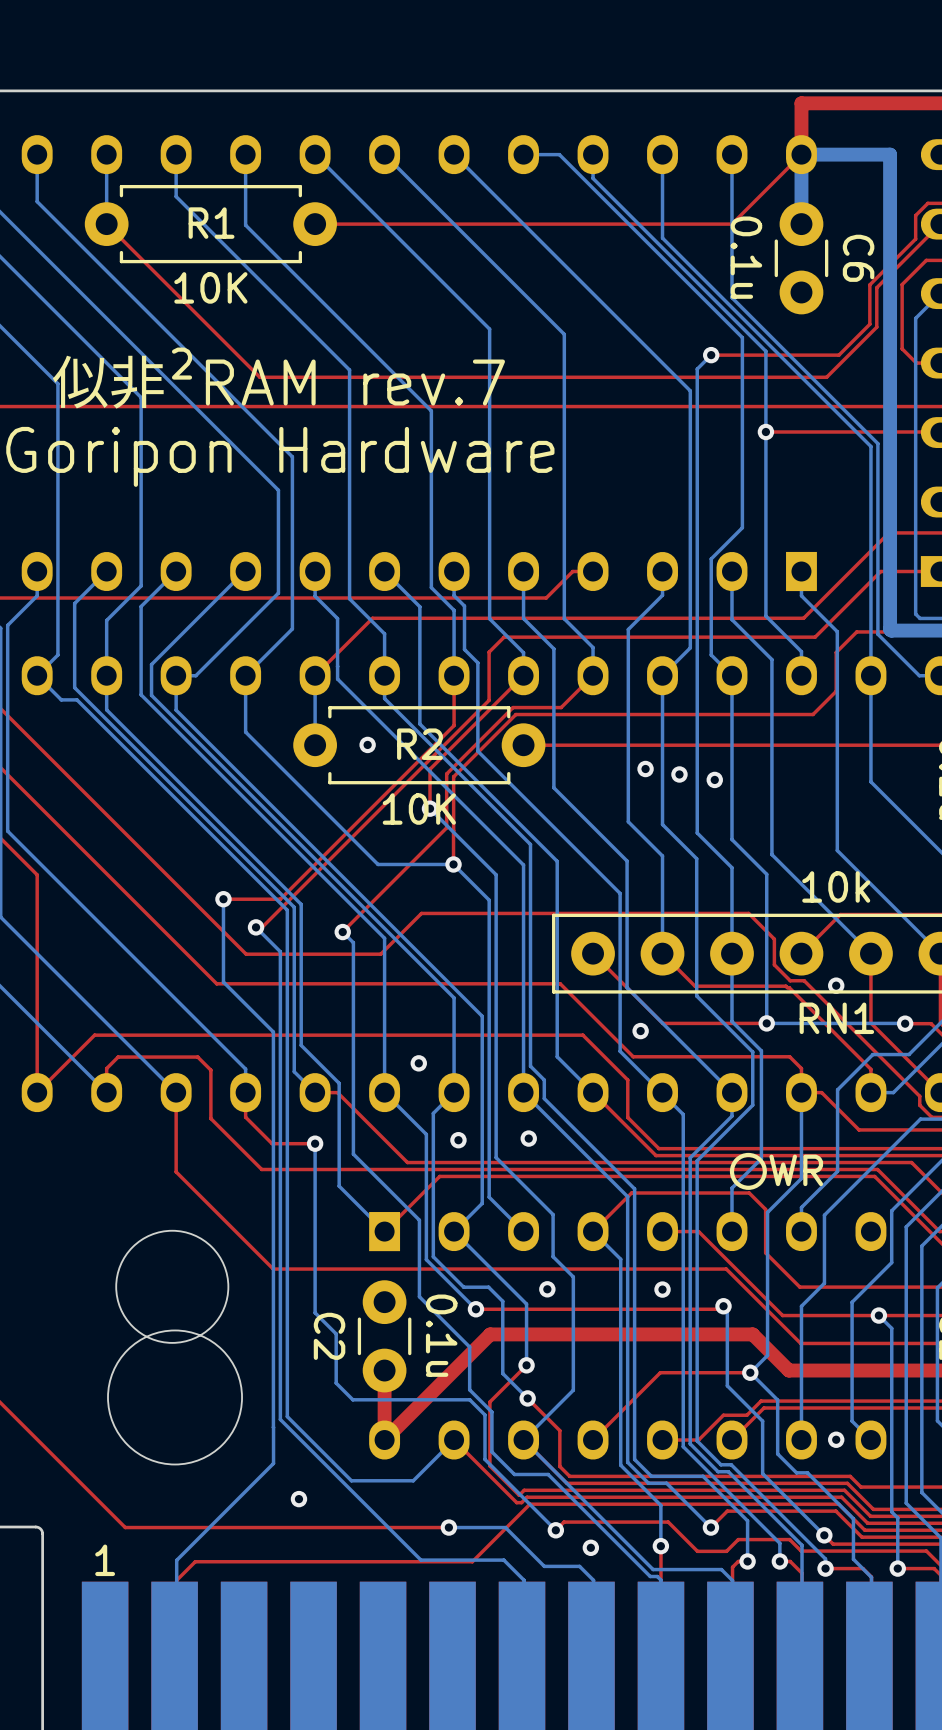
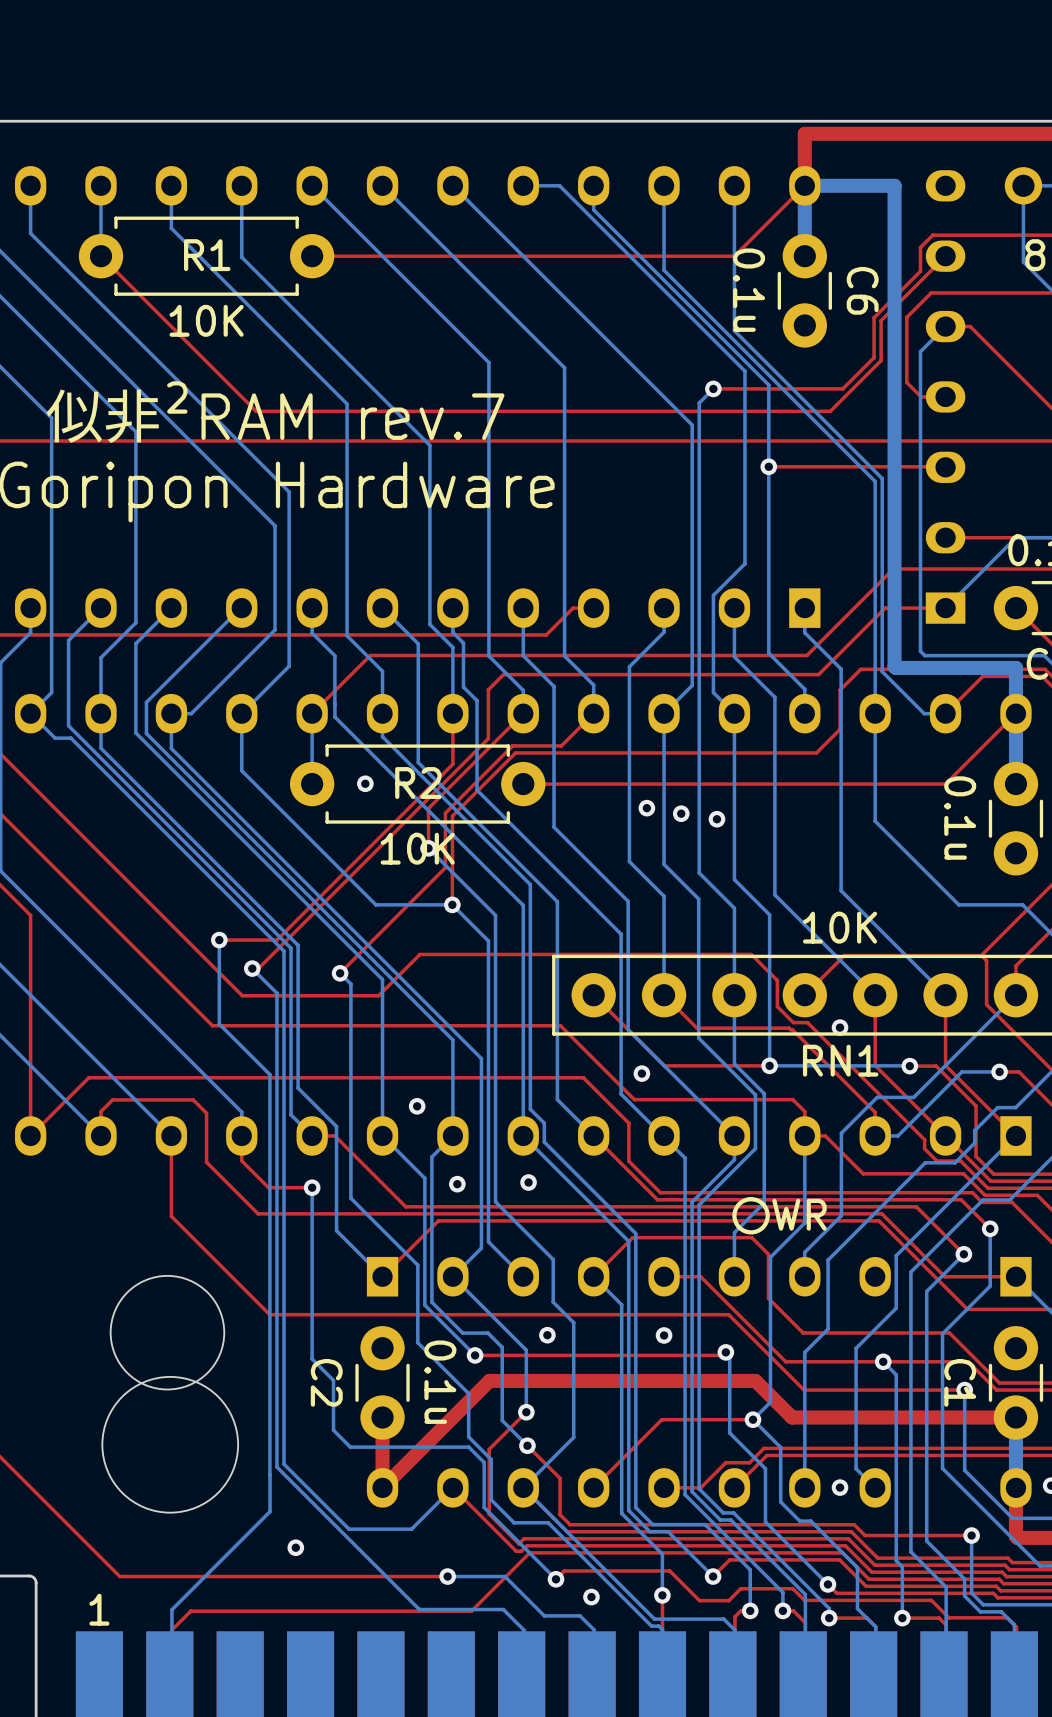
RN1 value: 10k (836, 886) -> 10K (840, 927)

